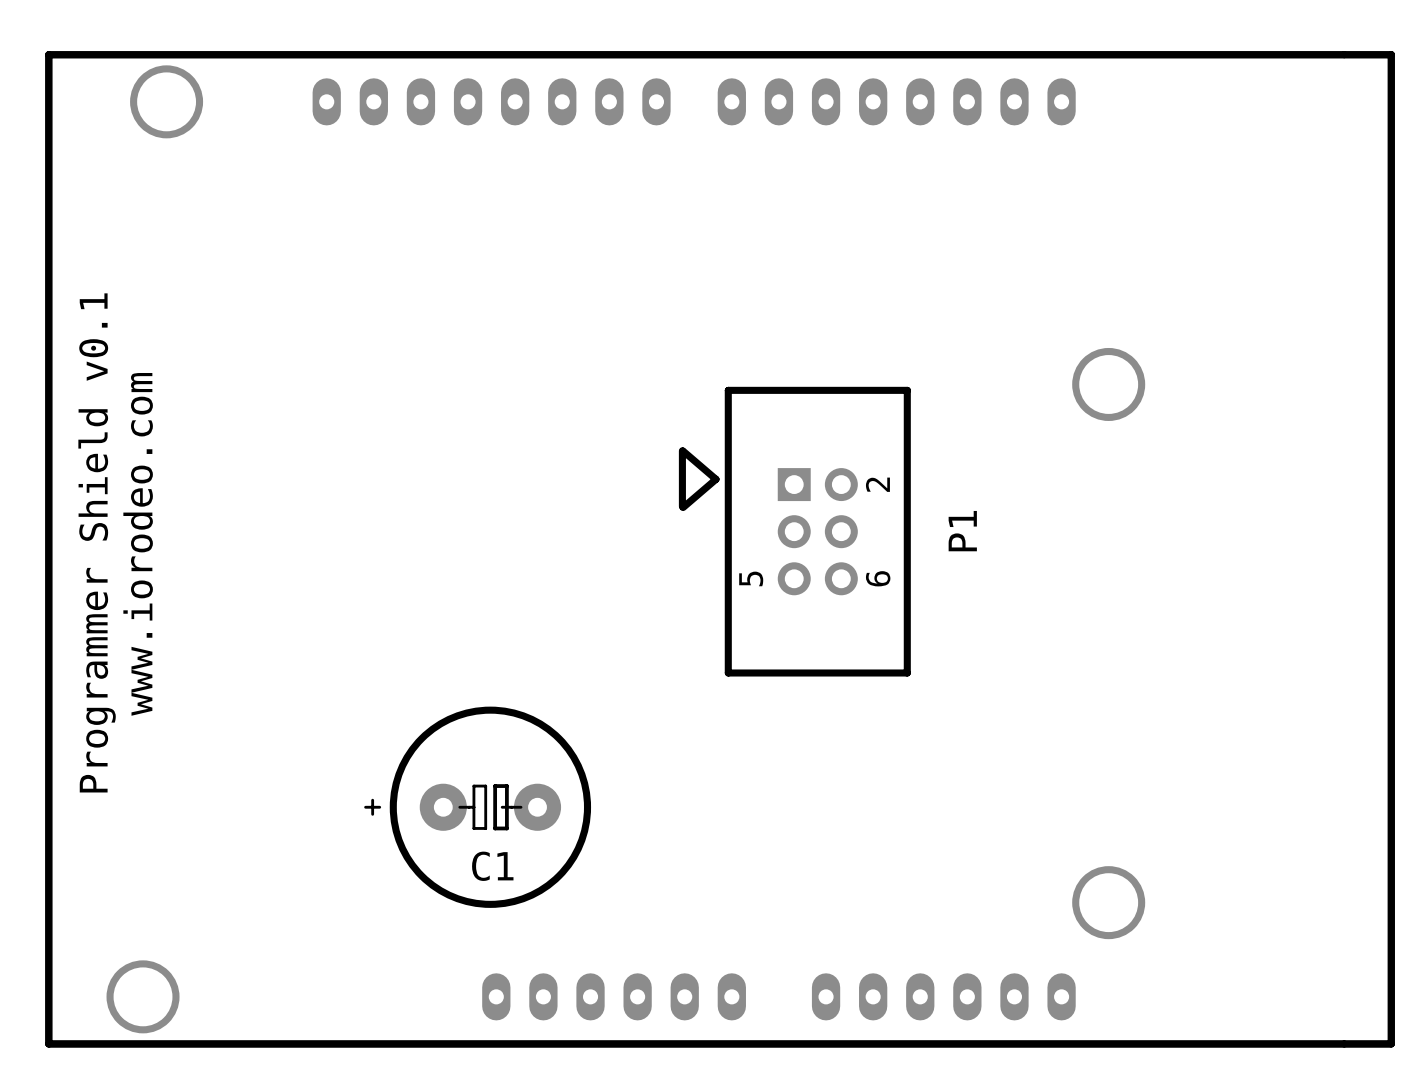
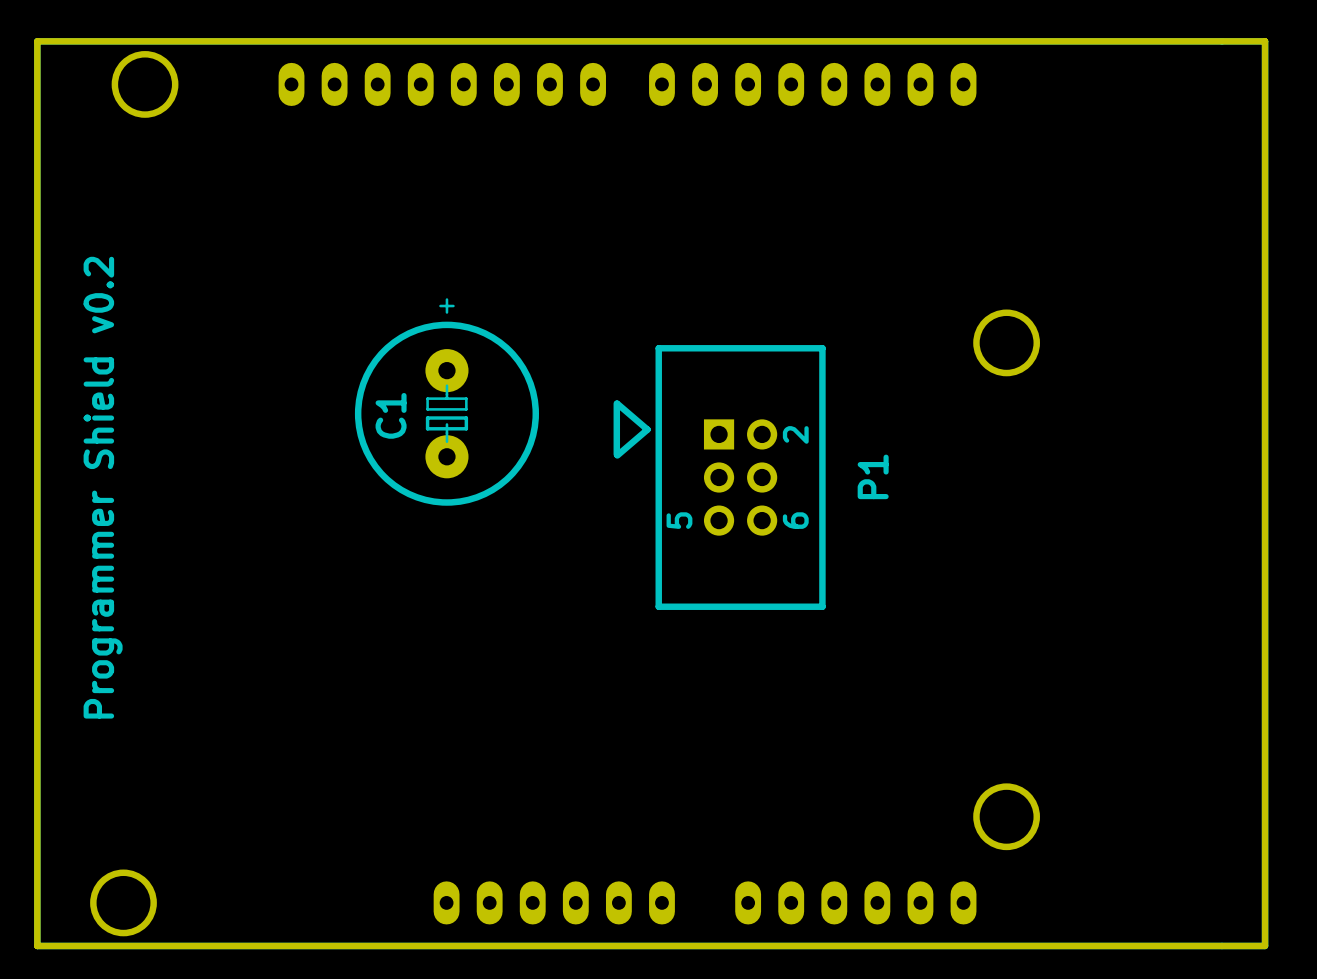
text: Programmer Shield v0.1 (97, 542) -> Programmer Shield v0.2 (103, 487)
text: www.iorodeo.com (138, 544) -> none
C1 rotation: 0° (477, 807) -> 90° clockwise (446, 402)
C1 position: (477, 807) -> (446, 402)

